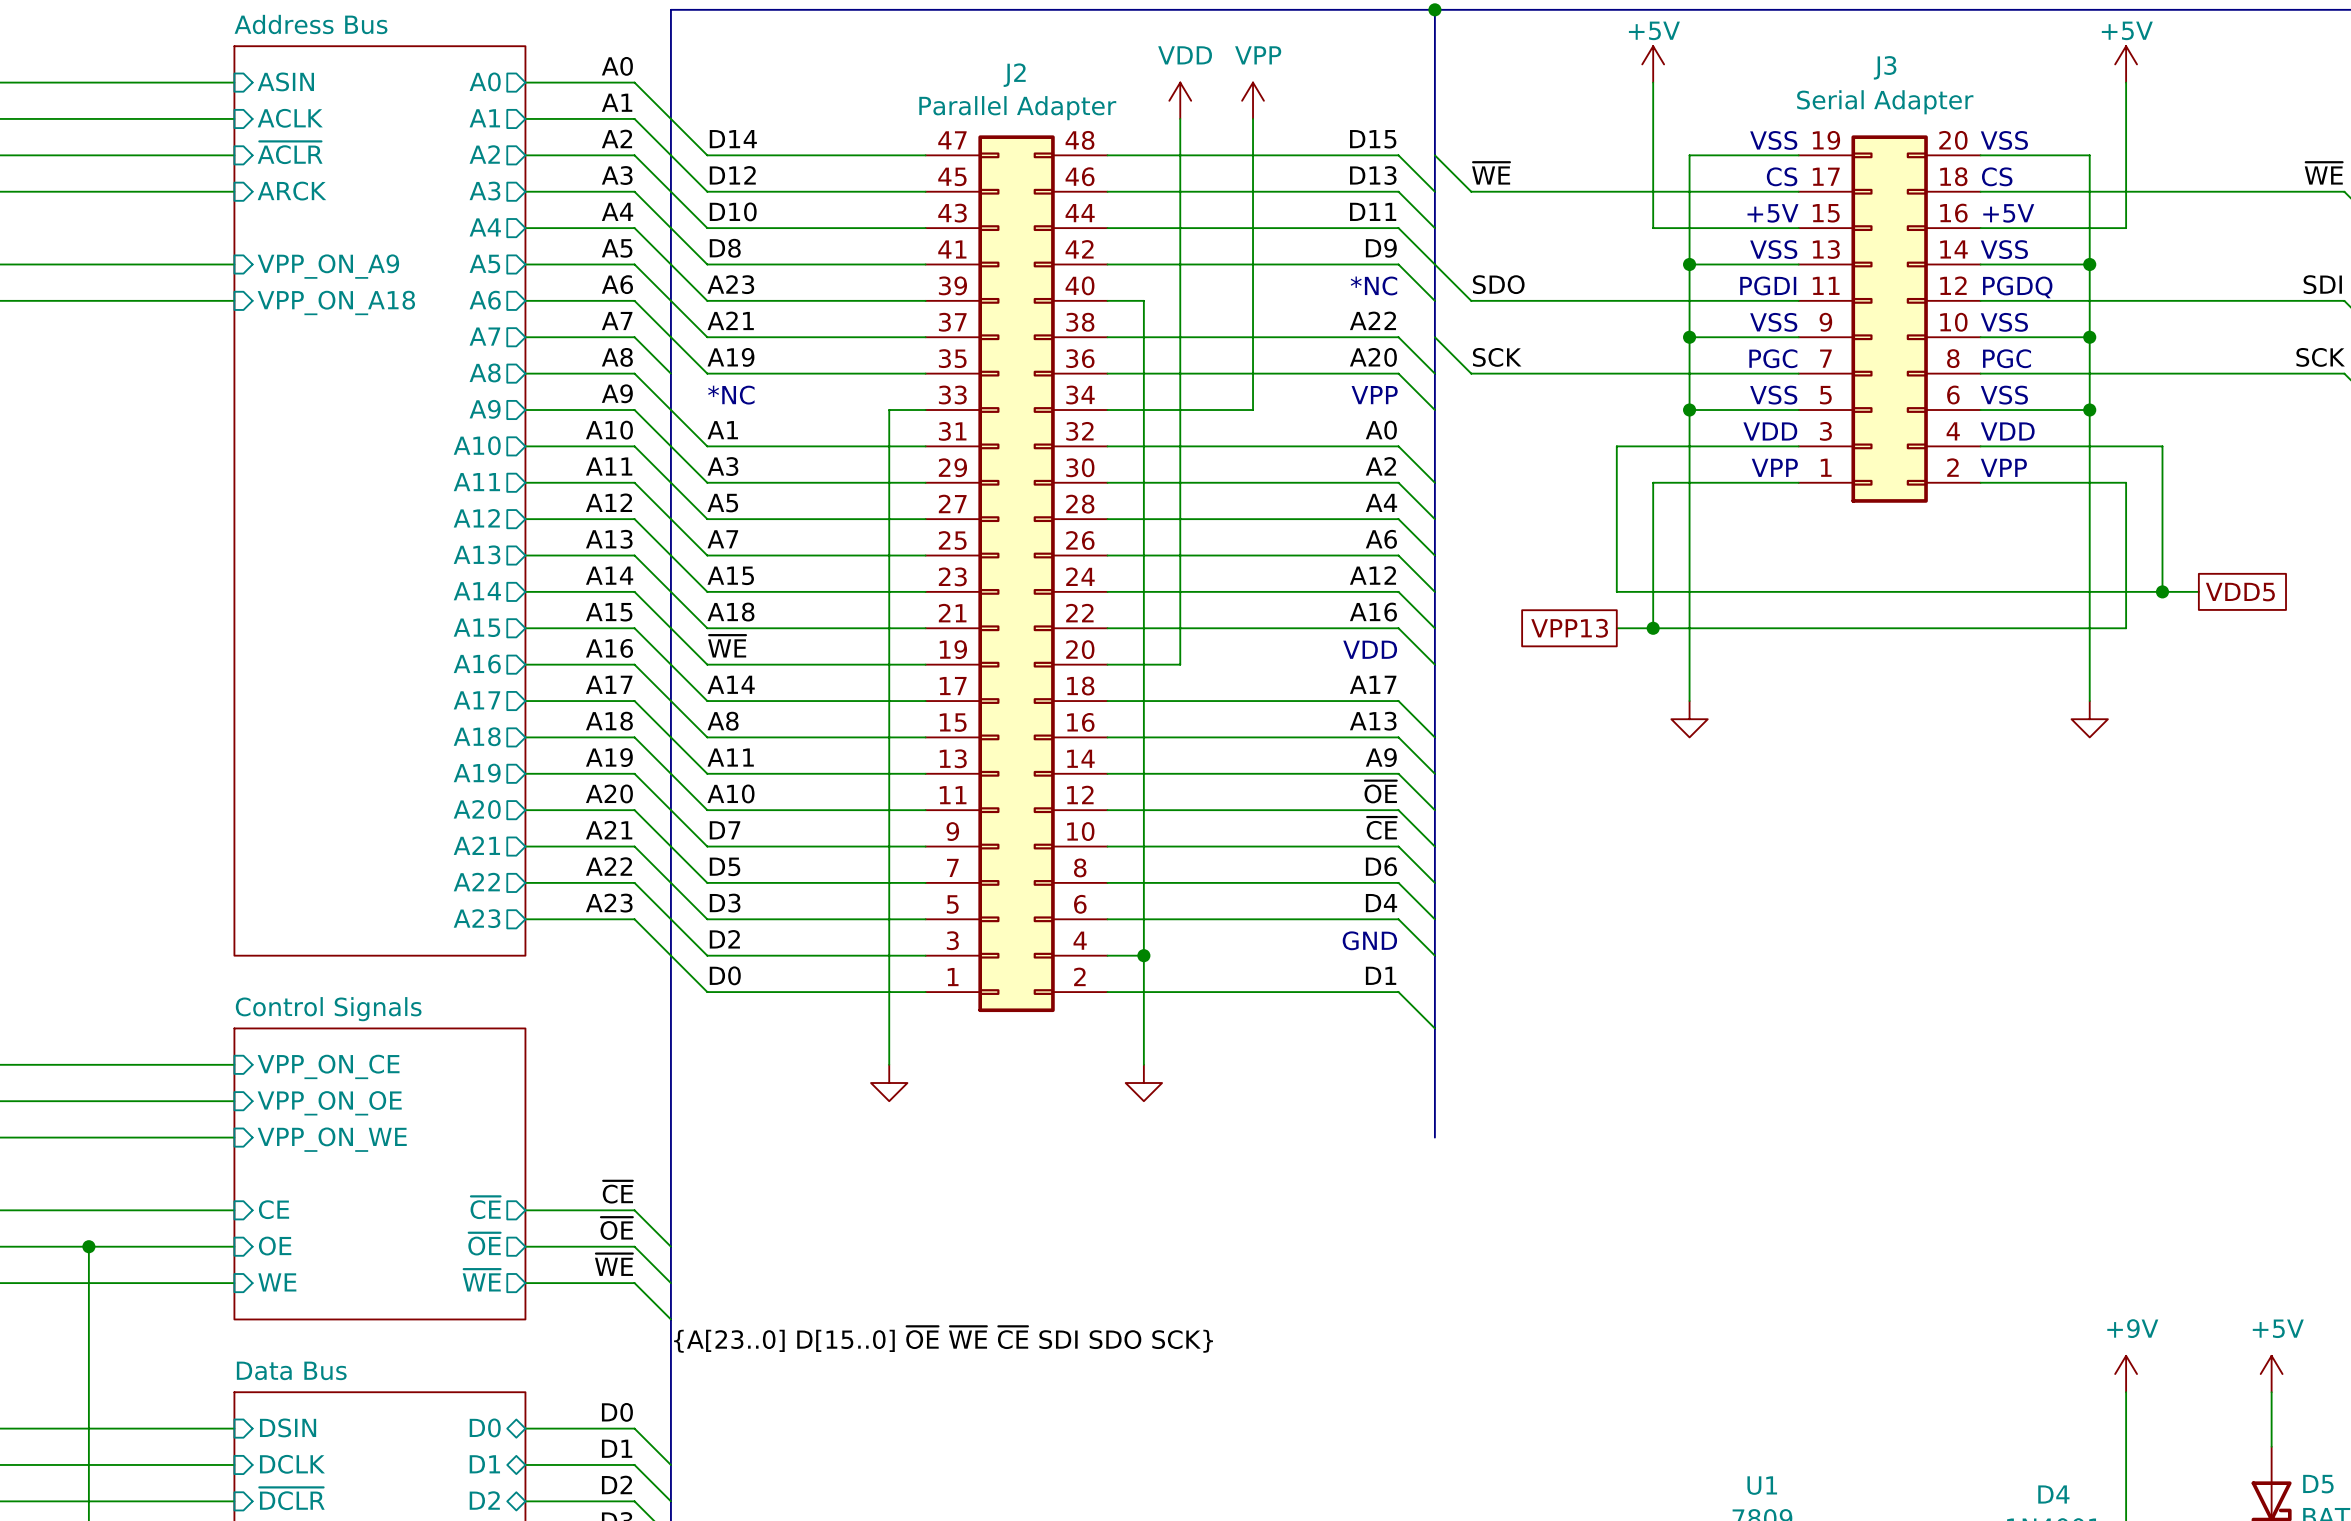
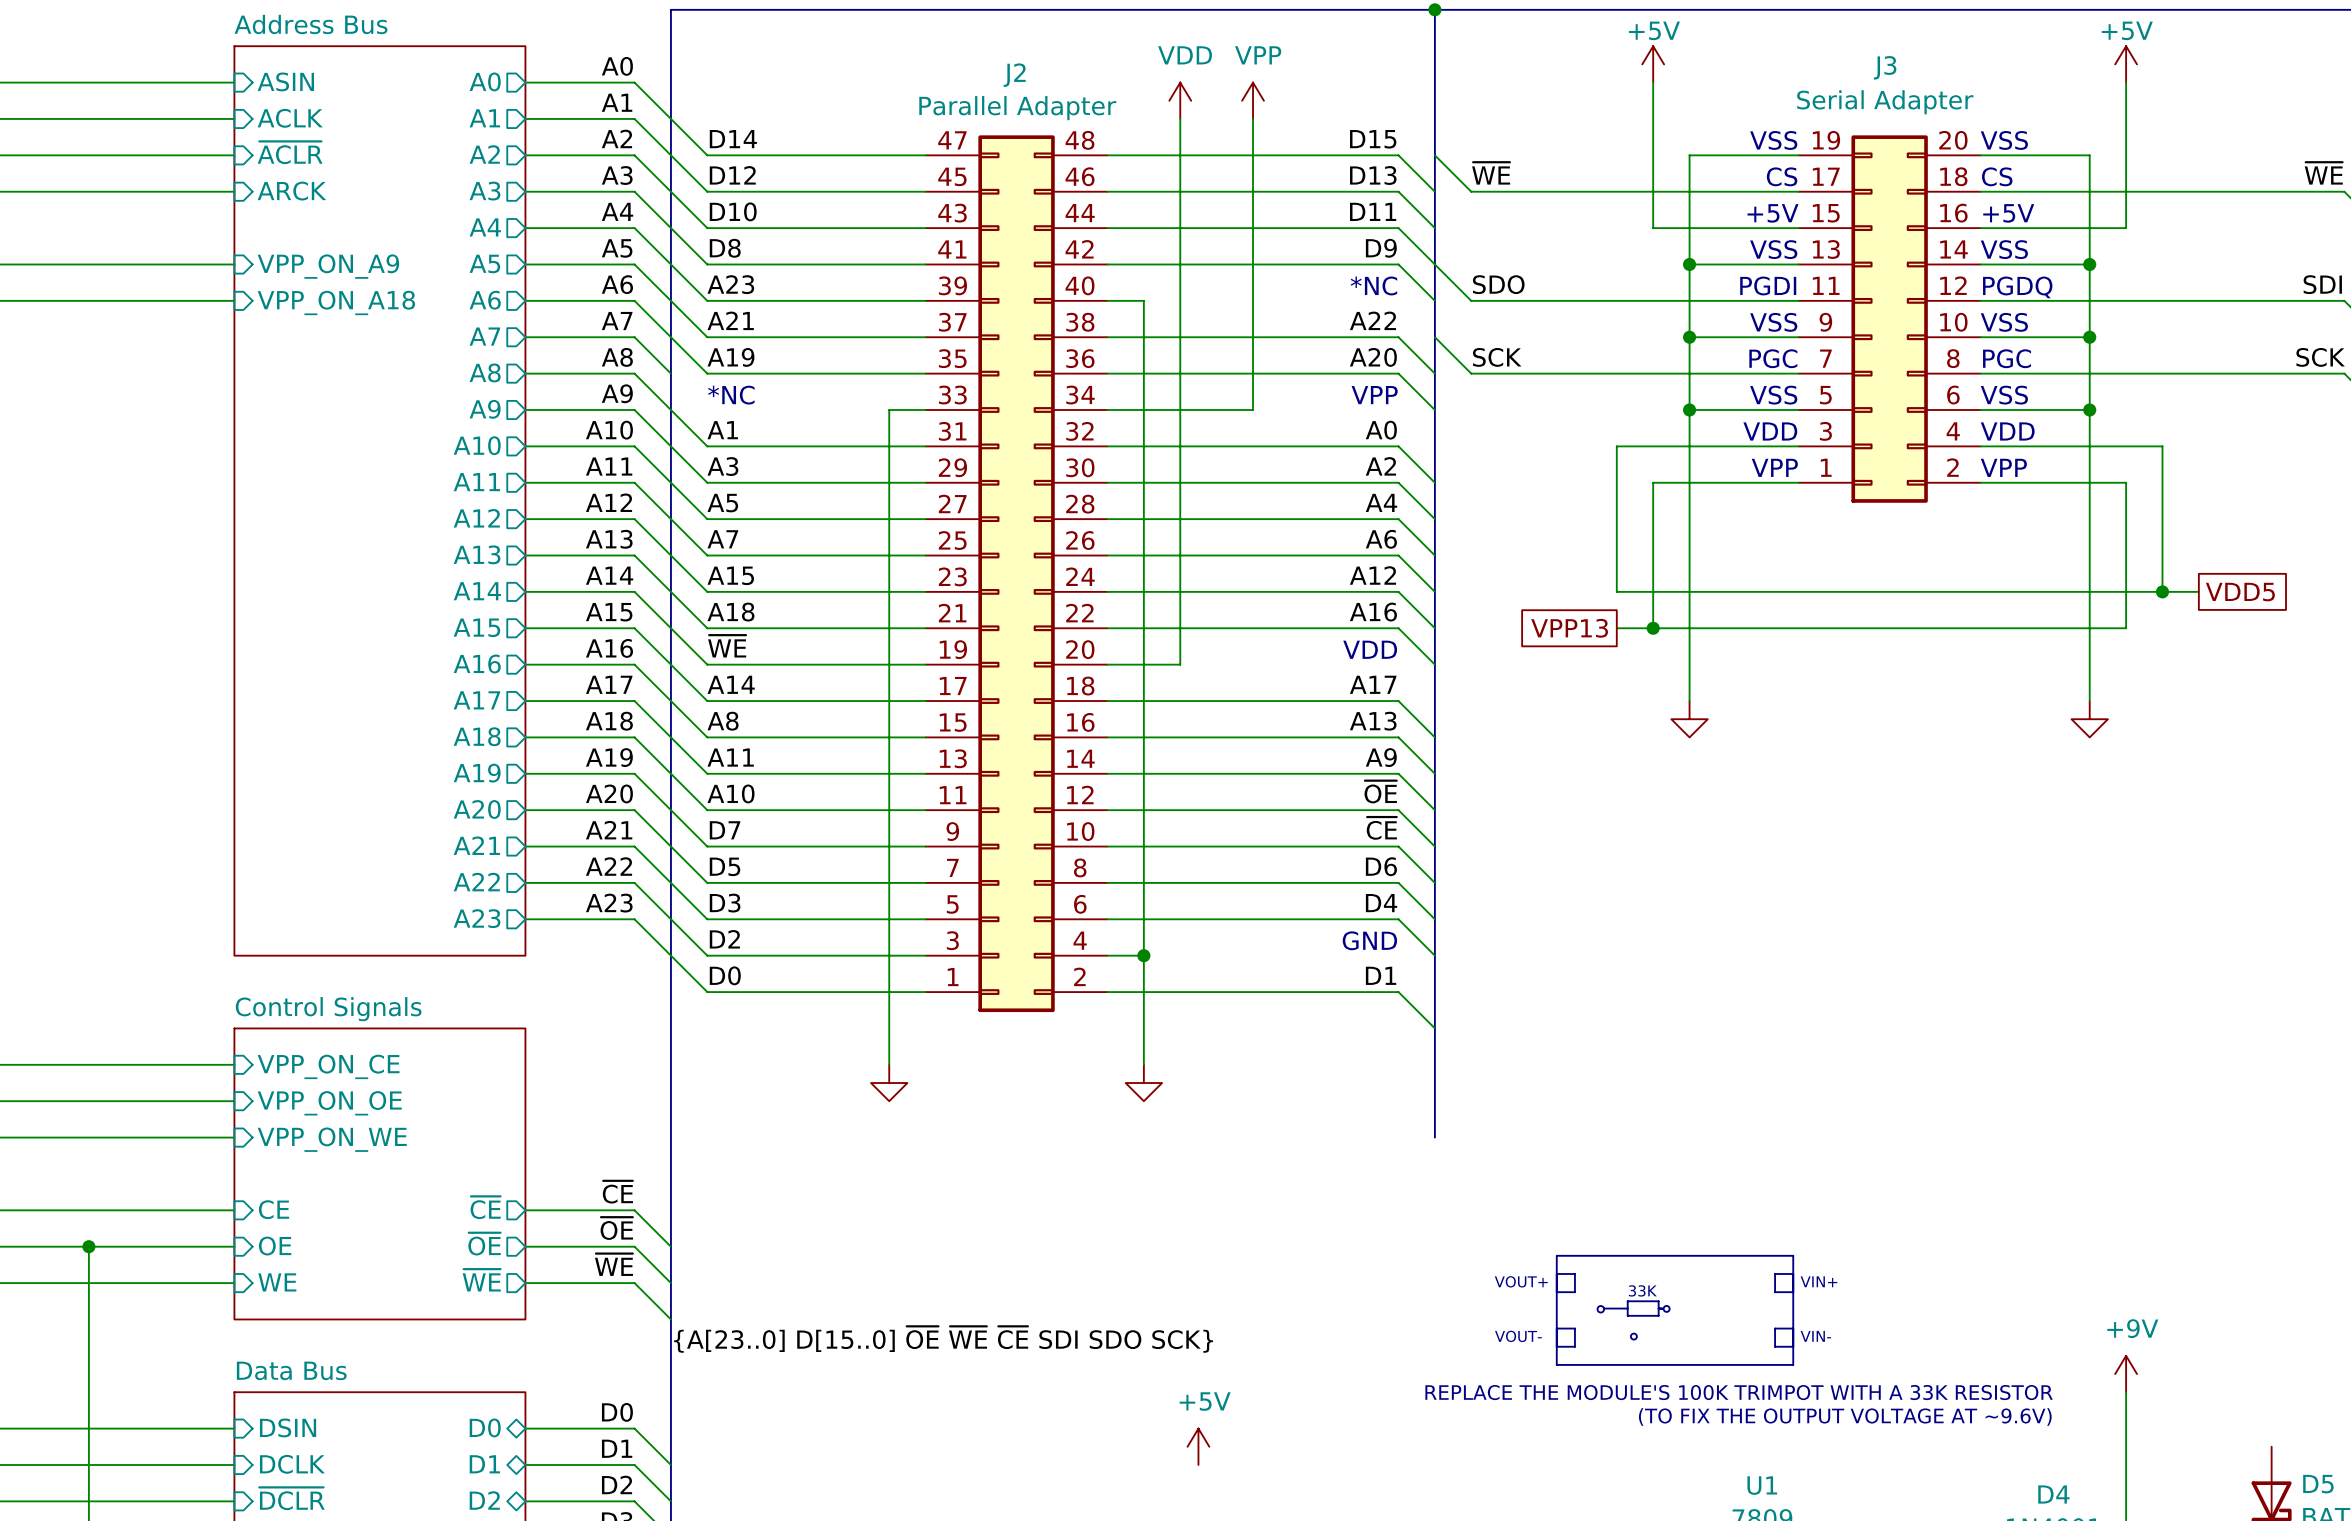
line: none -> (1556, 1255) (1793, 1255) (1793, 1364) (1556, 1364) (1556, 1255)
line: none -> (1556, 1273) (1574, 1273) (1574, 1292) (1556, 1292)
line: none -> (1793, 1273) (1775, 1273) (1775, 1292) (1793, 1292)
text: none -> VOUT+ (1521, 1281)
text: none -> VIN+ (1818, 1281)
text: none -> 33K (1642, 1290)
line: none -> (1627, 1301) (1658, 1301) (1658, 1315) (1627, 1315) (1627, 1301)
drawing: none -> [1663, 1305, 1670, 1312]
drawing: none -> [1597, 1306, 1605, 1313]
line: none -> (1604, 1308) (1627, 1308)
line: none -> (1556, 1328) (1574, 1328) (1574, 1346) (1556, 1346)
line: none -> (1793, 1328) (1775, 1328) (1775, 1346) (1793, 1346)
drawing: none -> [1630, 1333, 1637, 1340]
text: none -> VOUT- (1518, 1336)
text: none -> VIN- (1815, 1336)
power symbol: +5V (2271, 1374) -> none
text: none -> REPLACE THE MODULE'S 100K TRIMPOT WITH A 33K RESISTOR (1739, 1392)
wire: (2271, 1392) (2271, 1446) -> none
text: none -> (TO FIX THE OUTPUT VOLTAGE AT ~9.6V) (1845, 1416)
power symbol: none -> +5V (1198, 1446)

